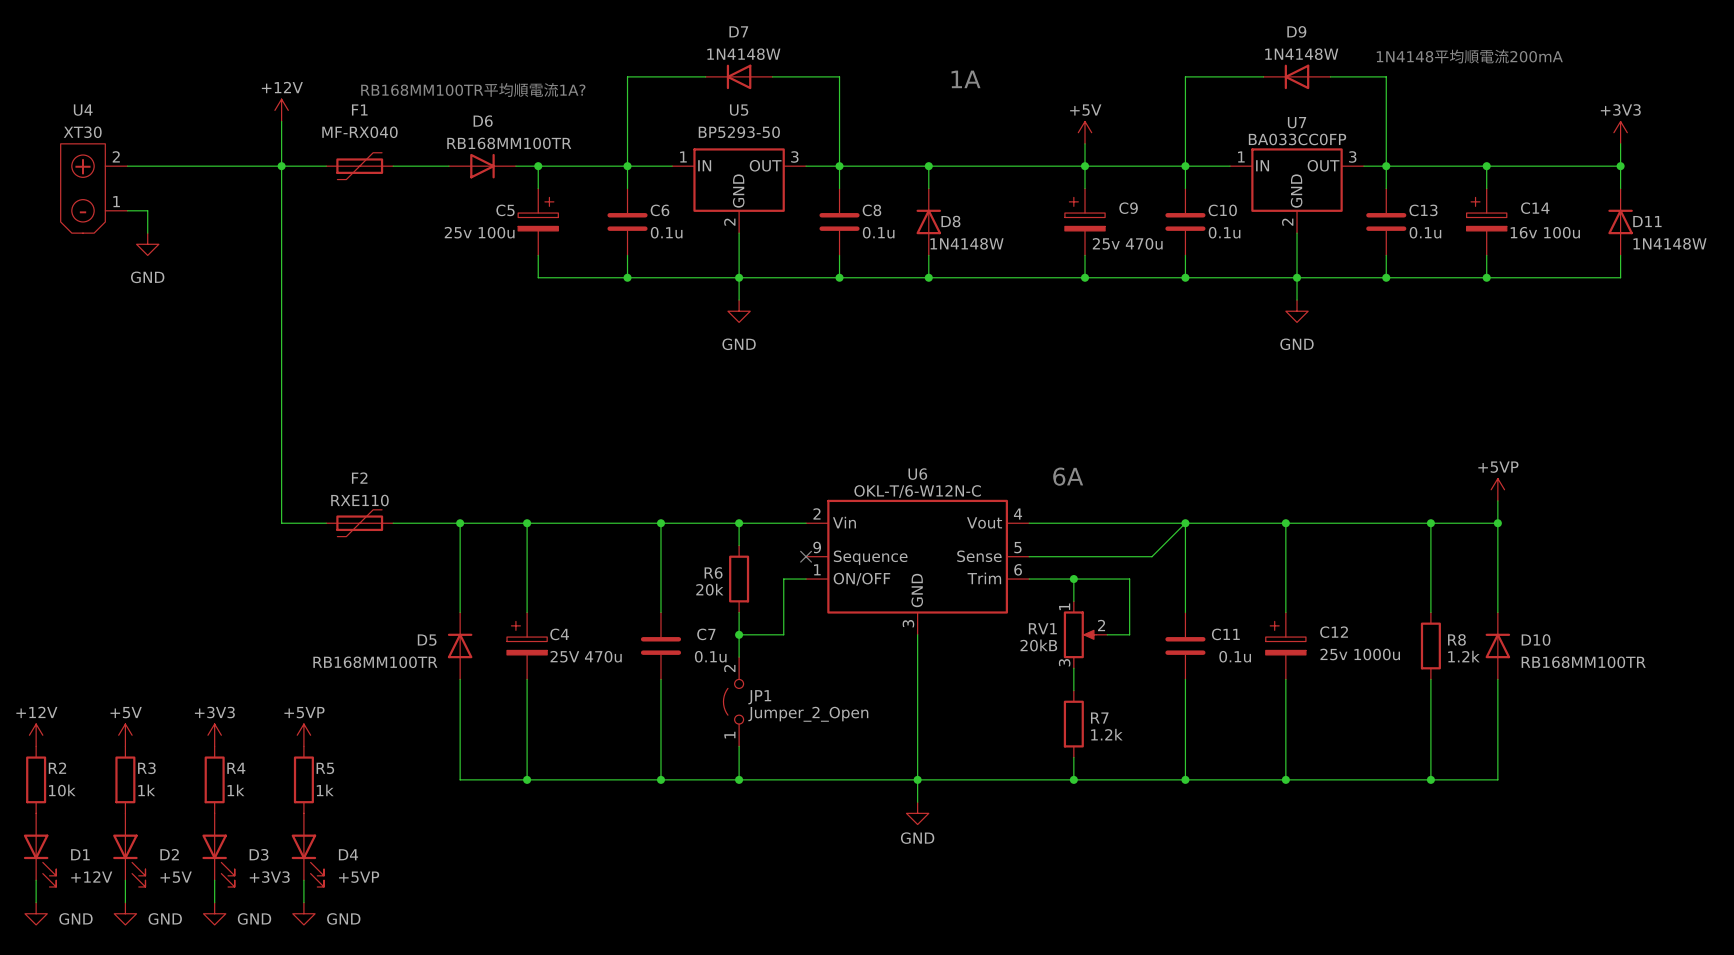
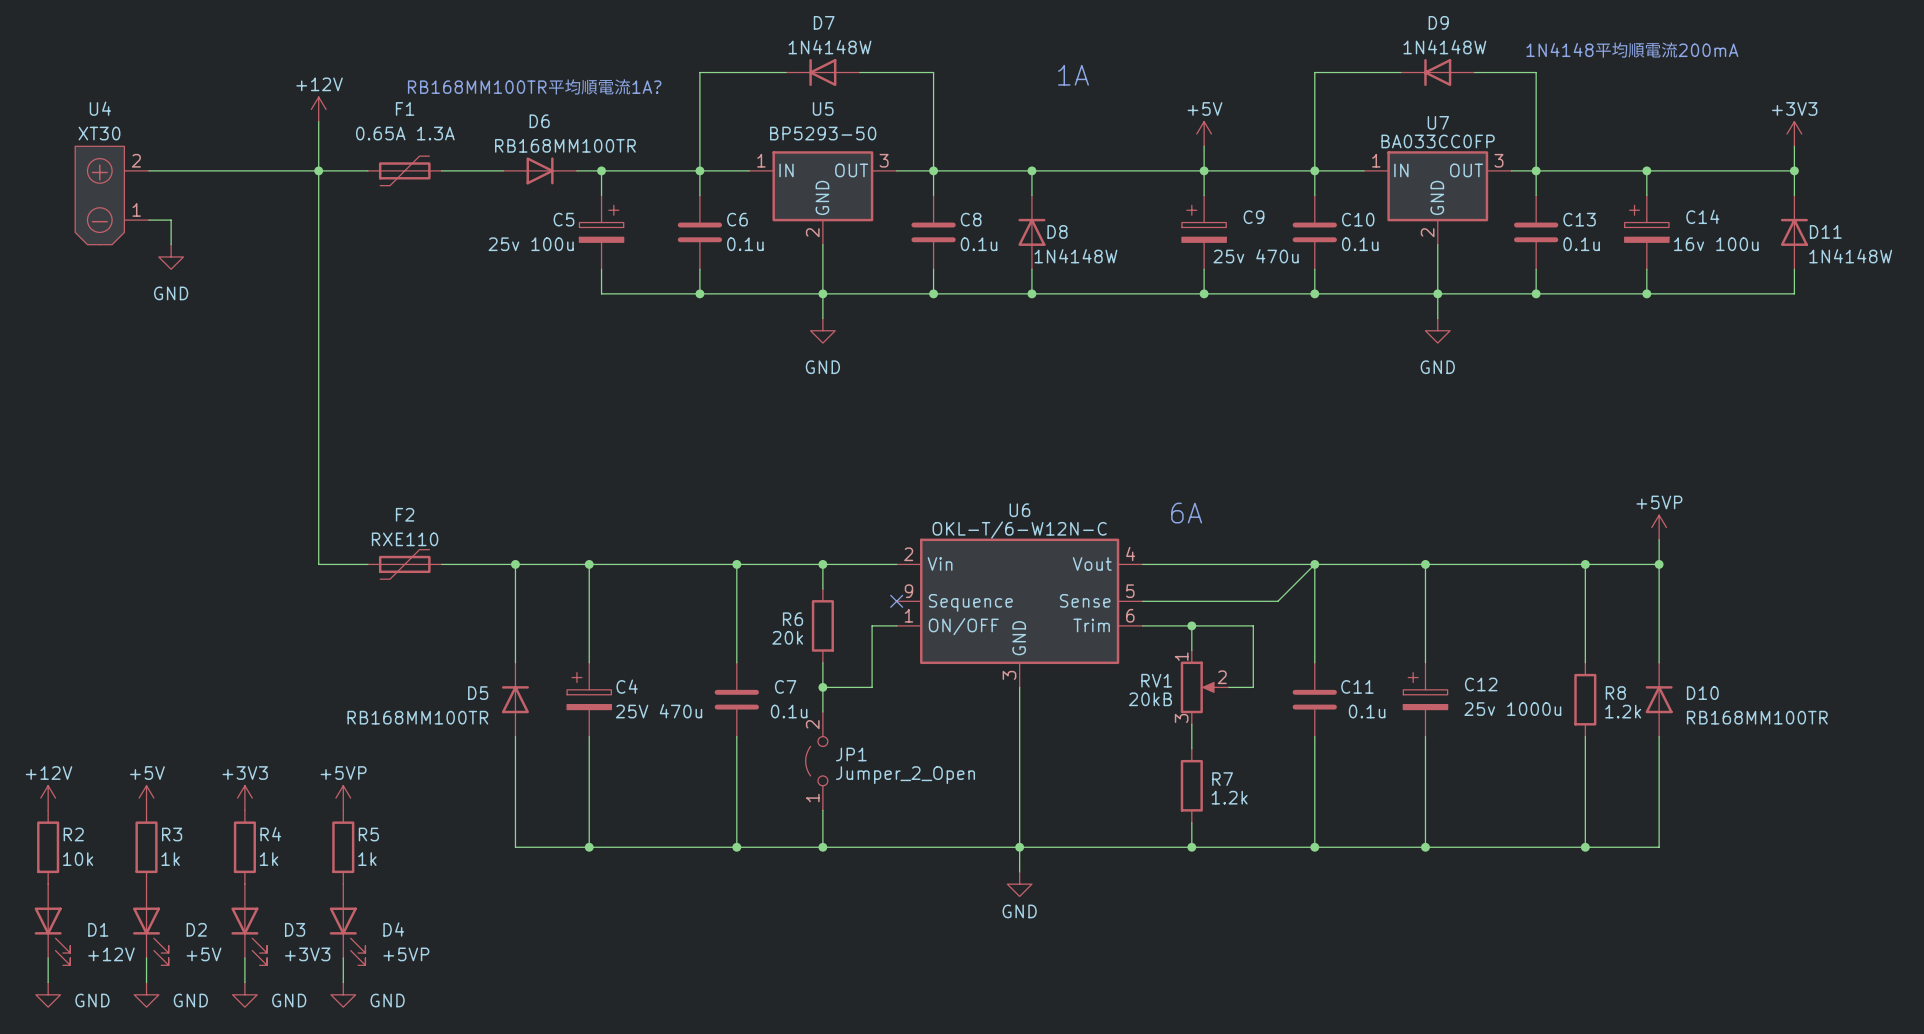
F1 value: MF-RX040 (359, 132) -> 0.65A 1.3A (405, 133)

